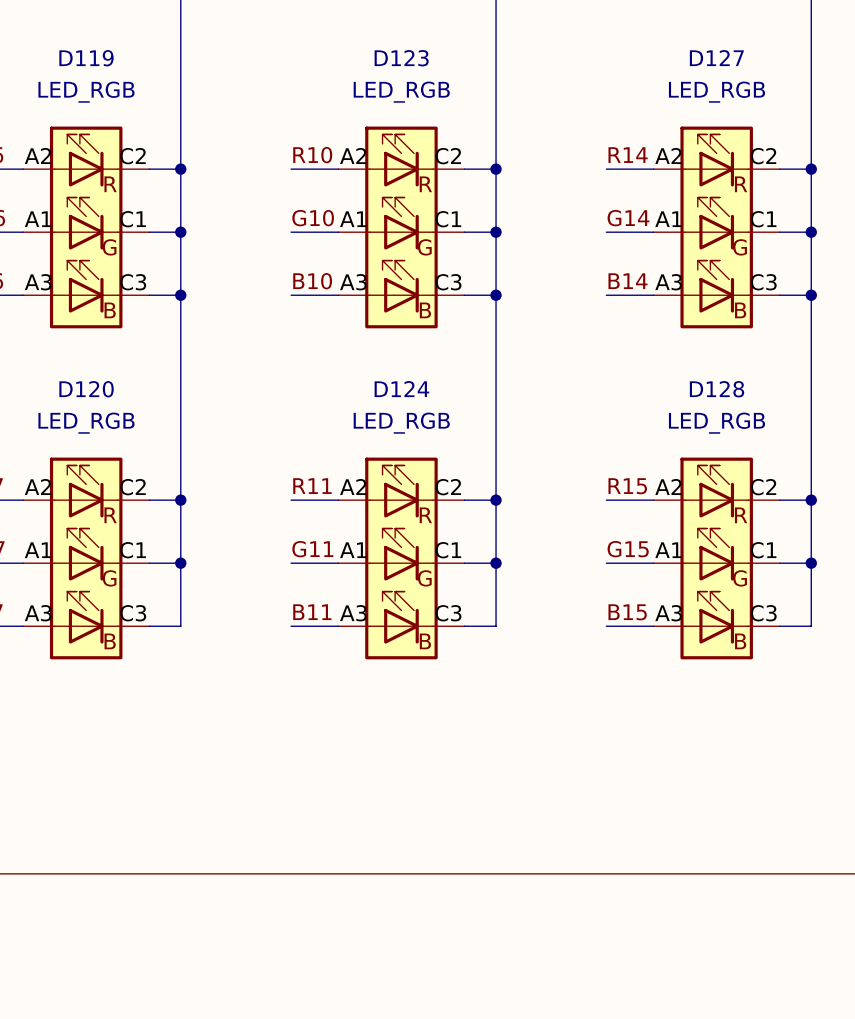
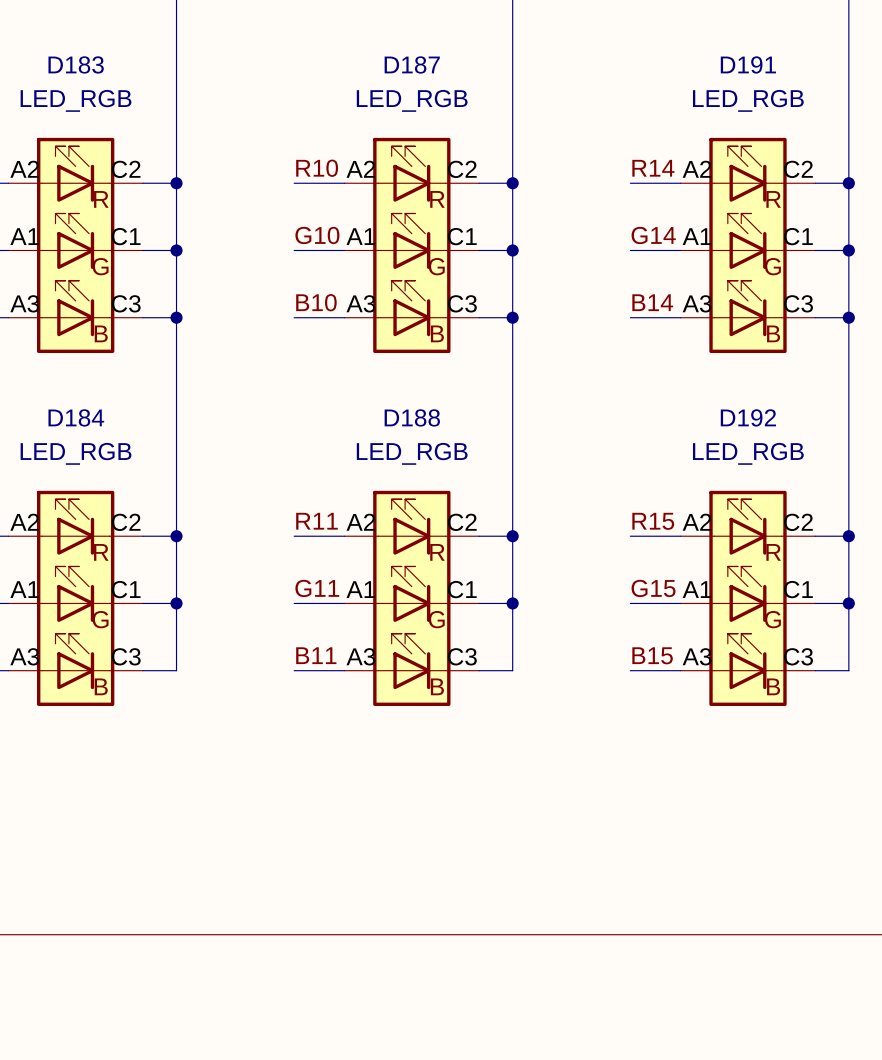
D119 name: D119 (86, 58) -> D183 (76, 64)
D123 name: D123 (401, 58) -> D187 (412, 64)
D127 name: D127 (716, 58) -> D191 (748, 64)
D120 name: D120 (86, 389) -> D184 (76, 417)
D124 name: D124 (401, 389) -> D188 (412, 417)
D128 name: D128 (717, 389) -> D192 (748, 417)

